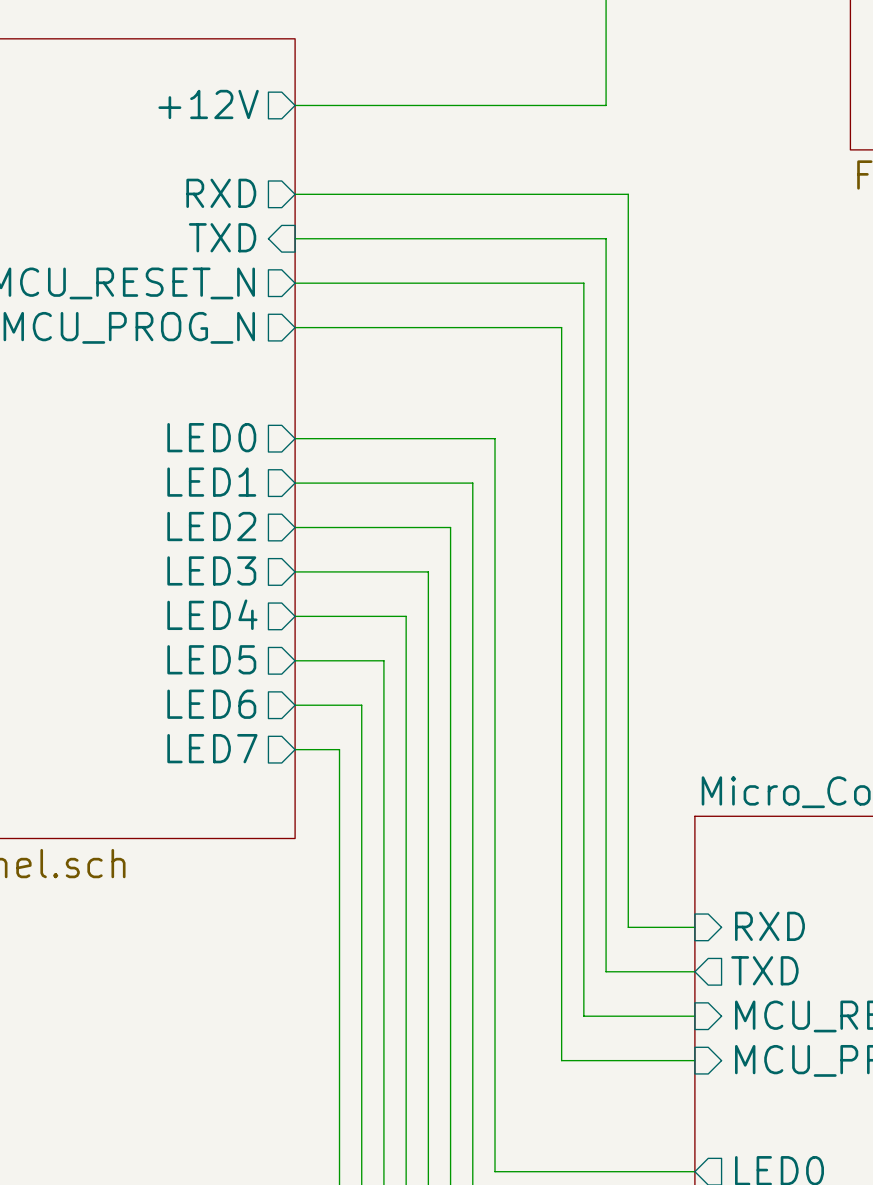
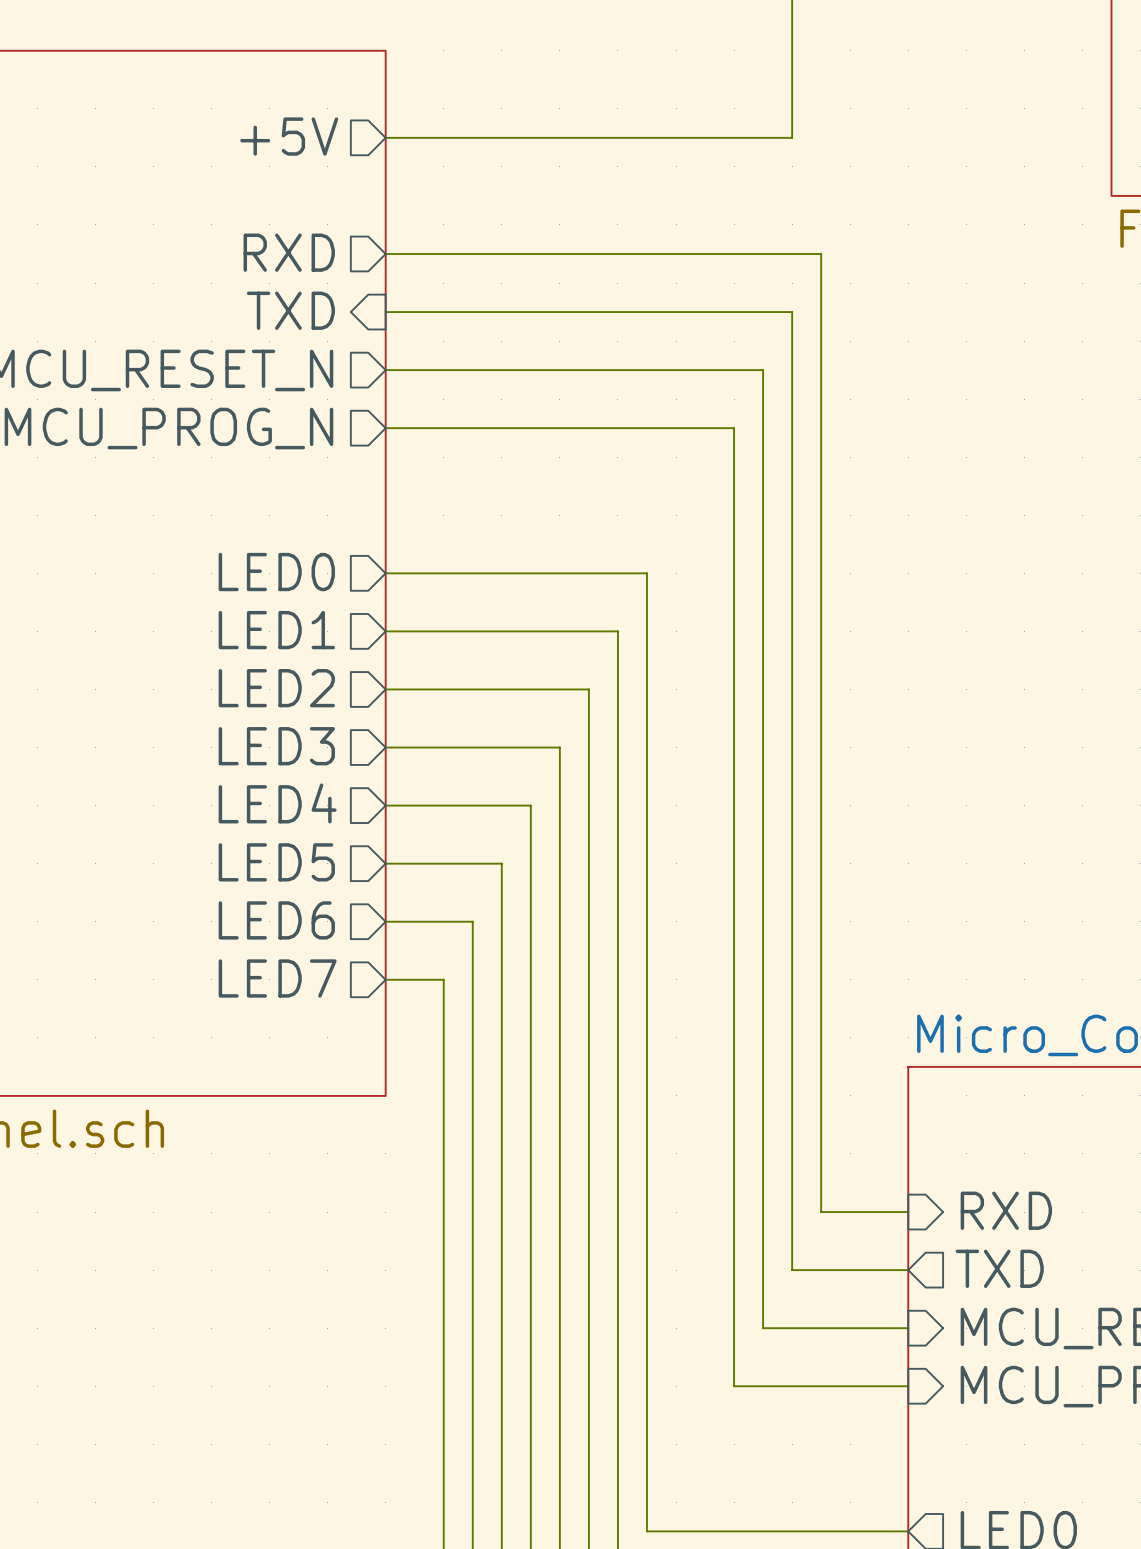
sheet pin: +12V (208, 104) -> +5V (289, 136)

